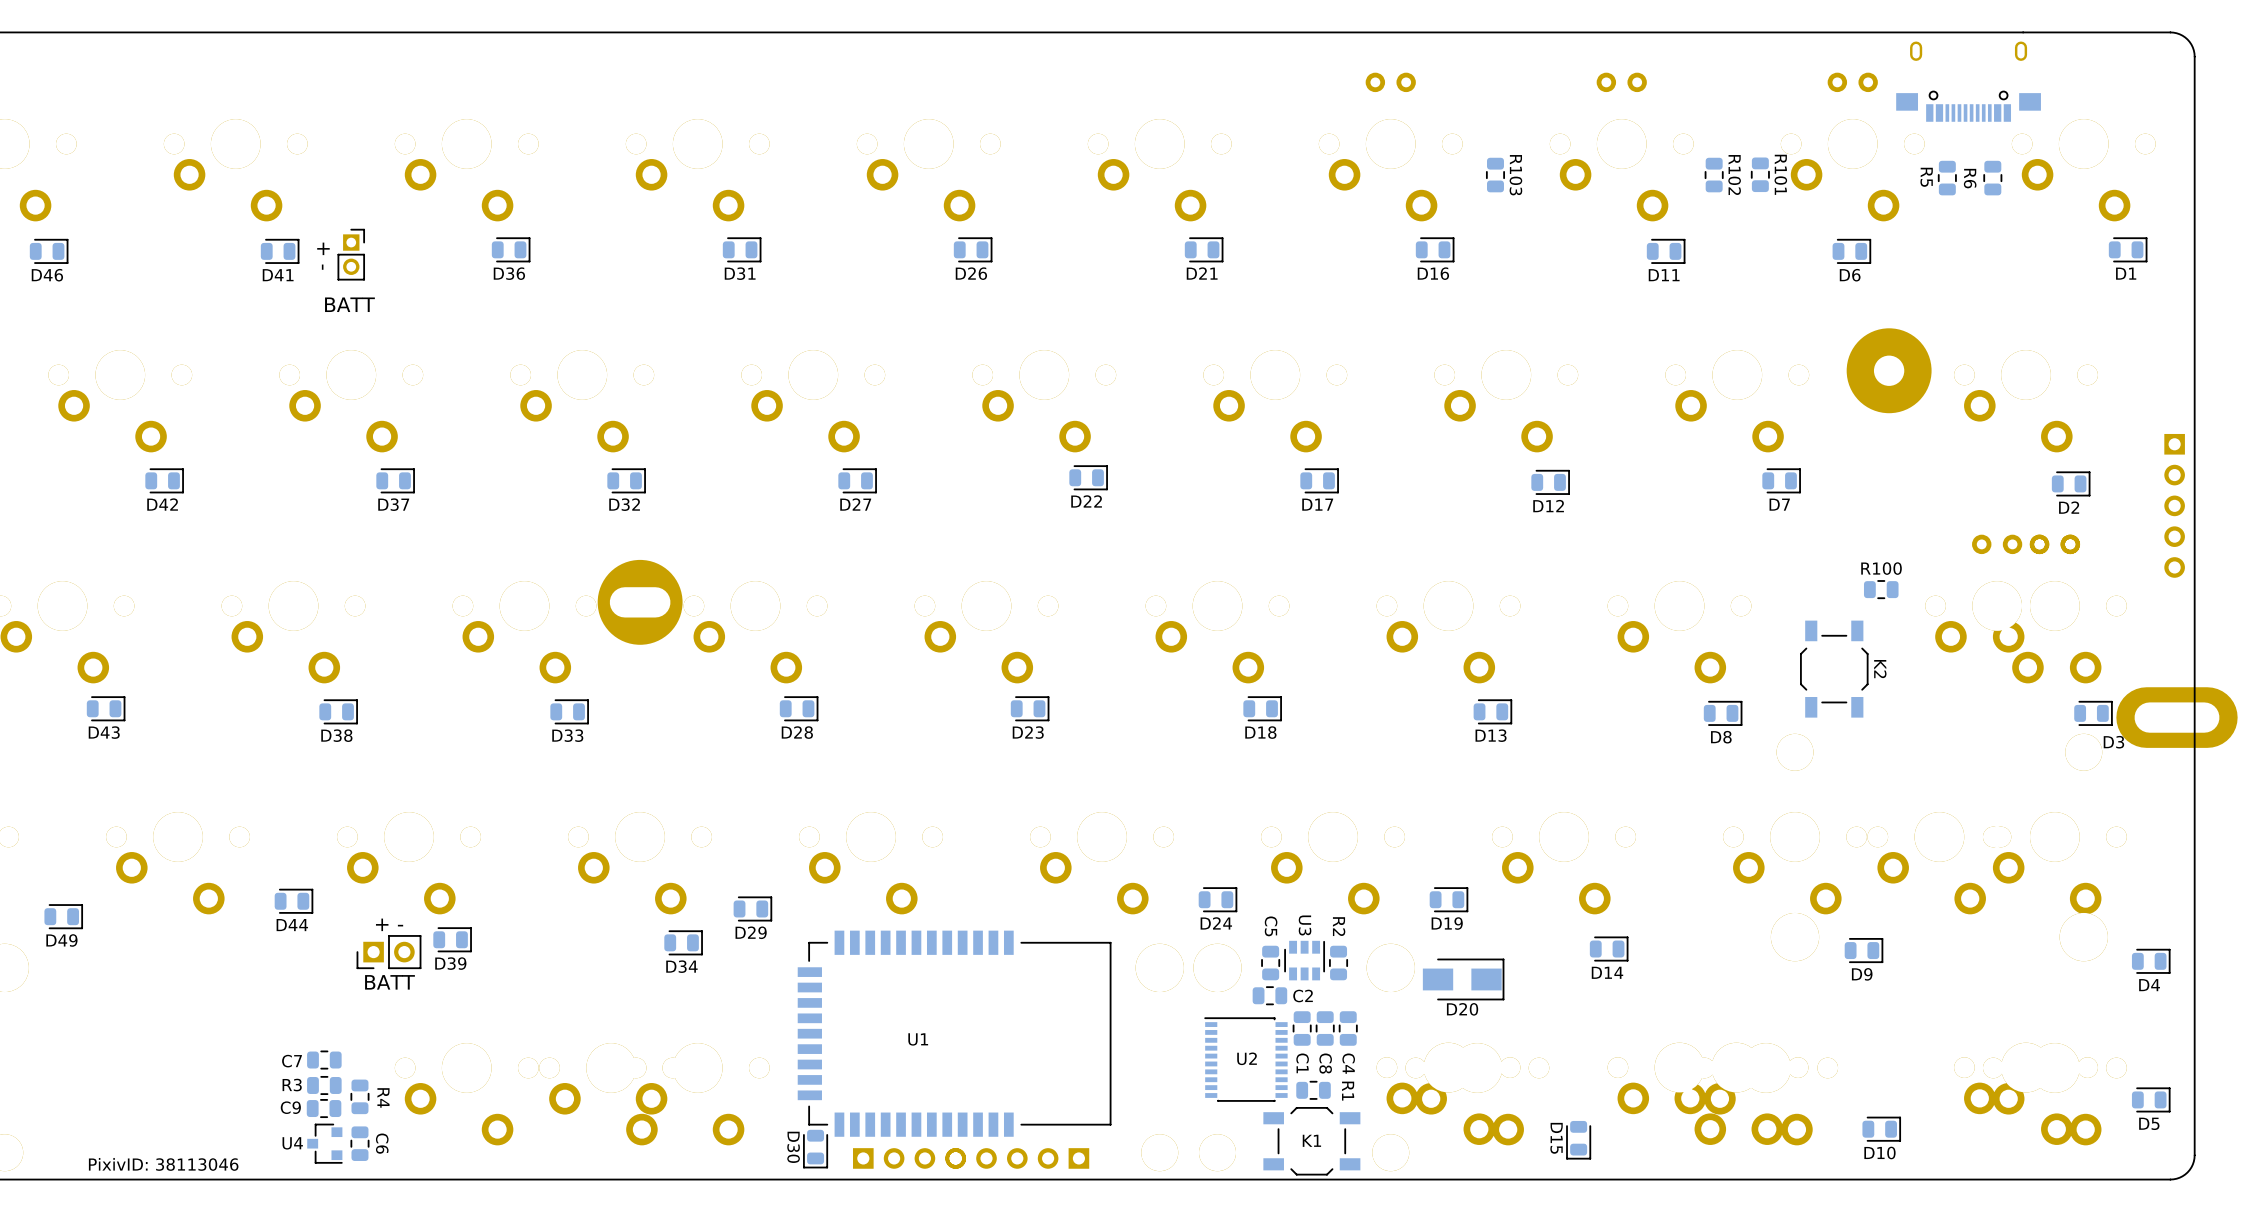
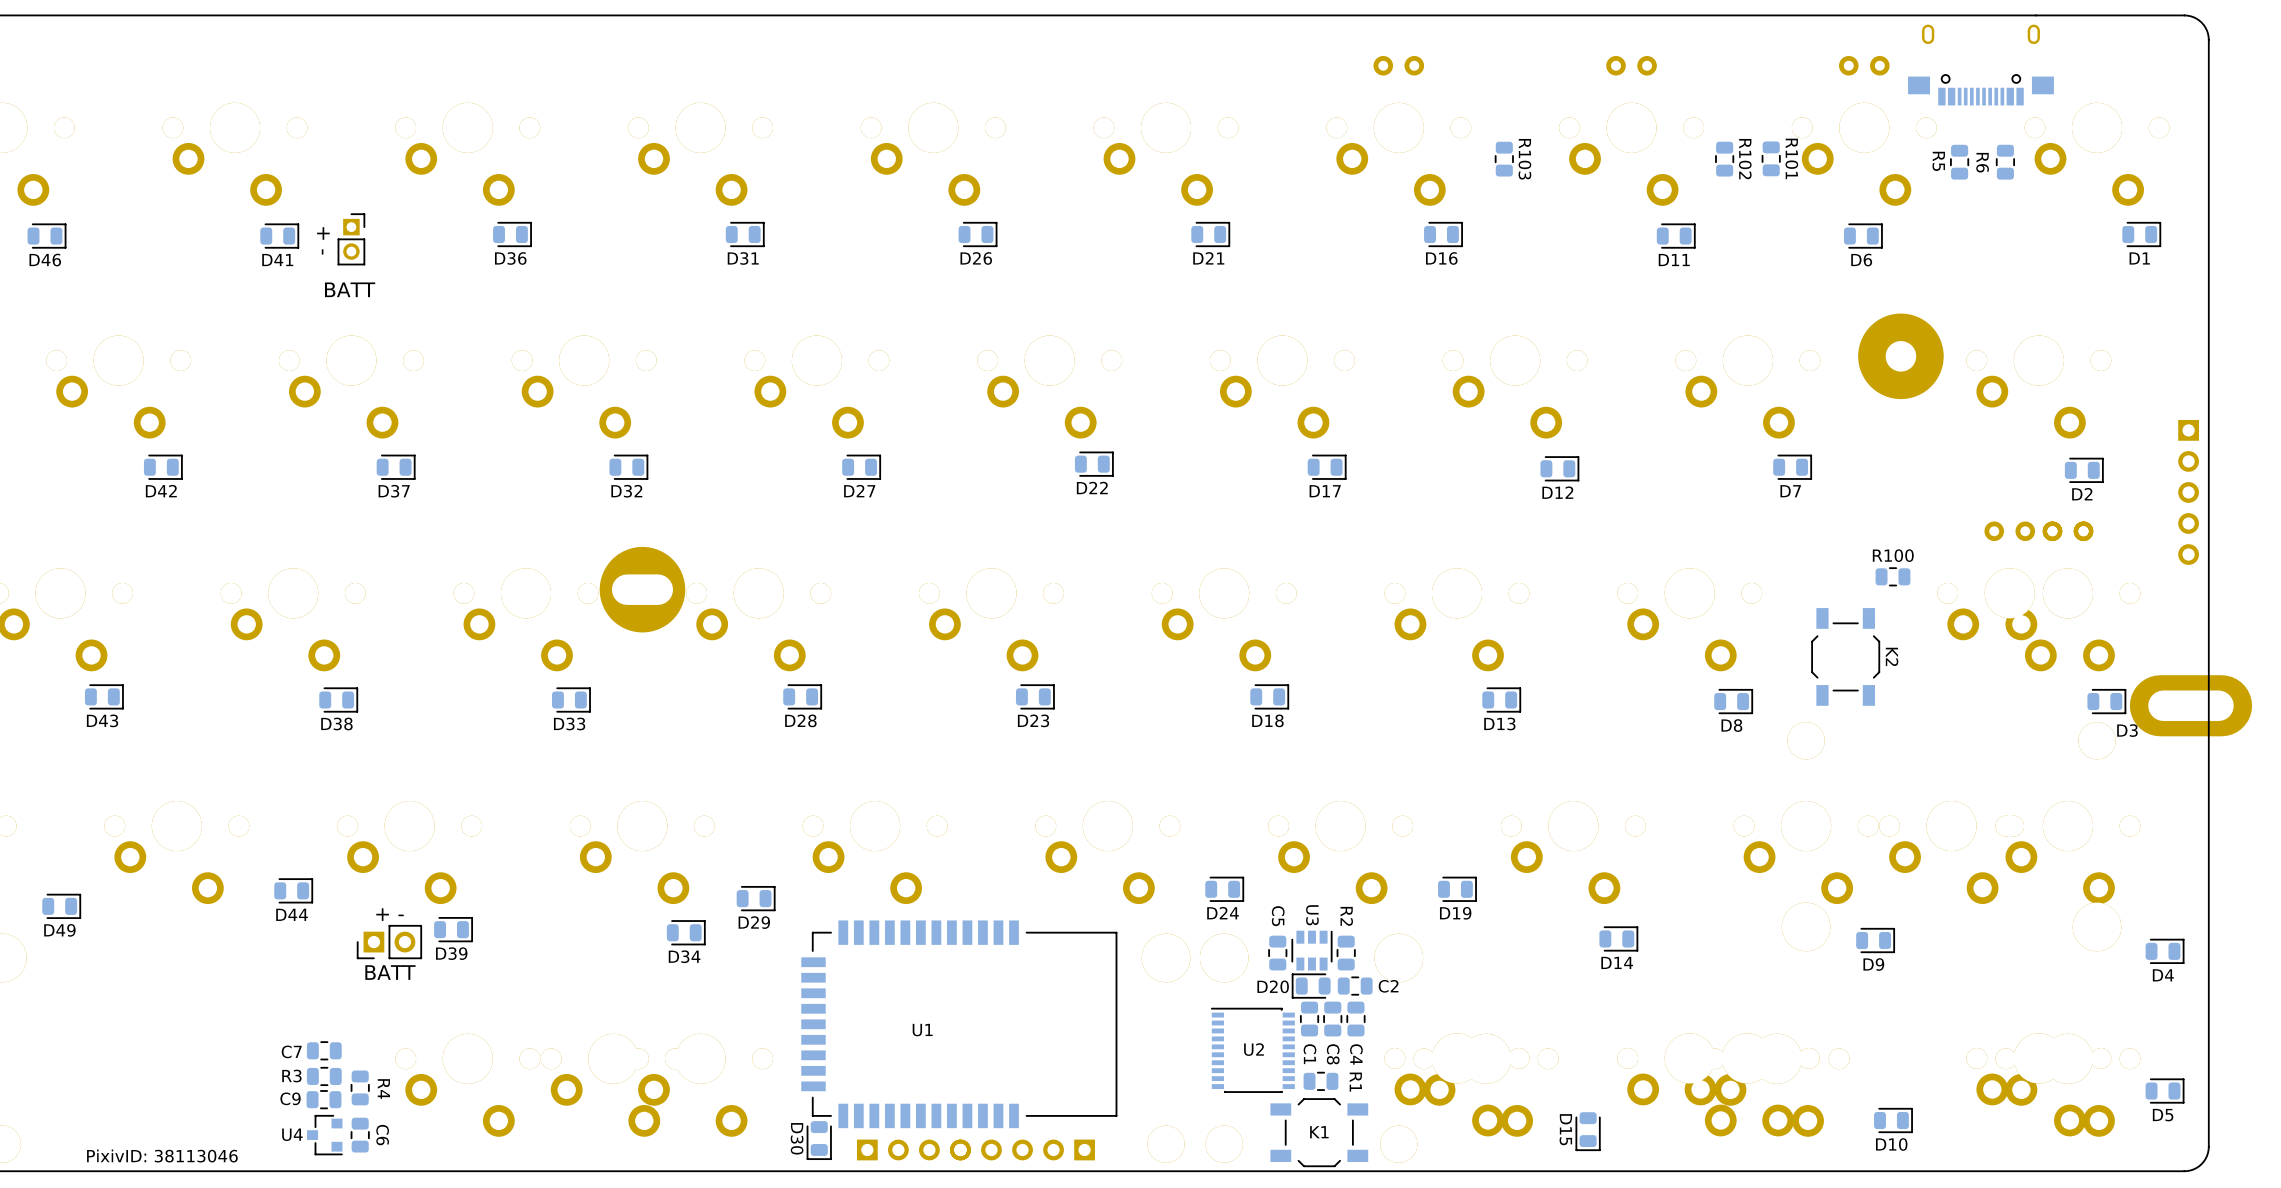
D20 footprint: [1422, 958, 1505, 1001] -> [1291, 973, 1331, 999]
C2 position: (1269, 995) -> (1355, 986)
D20 name position: D20 (1462, 1009) -> D20 (1273, 986)

